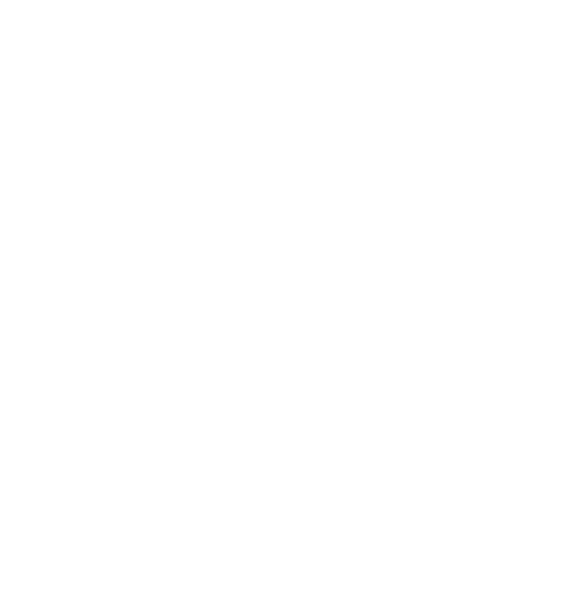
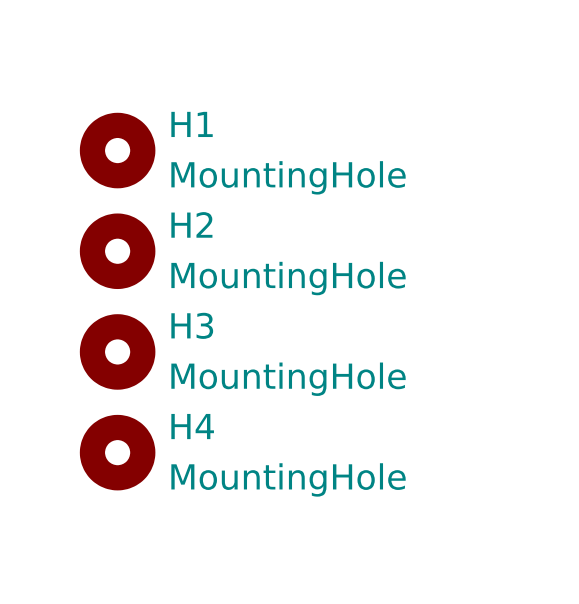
H1: none -> MountingHole (117, 150)
H2: none -> MountingHole (117, 251)
H3: none -> MountingHole (117, 351)
H4: none -> MountingHole (117, 452)

